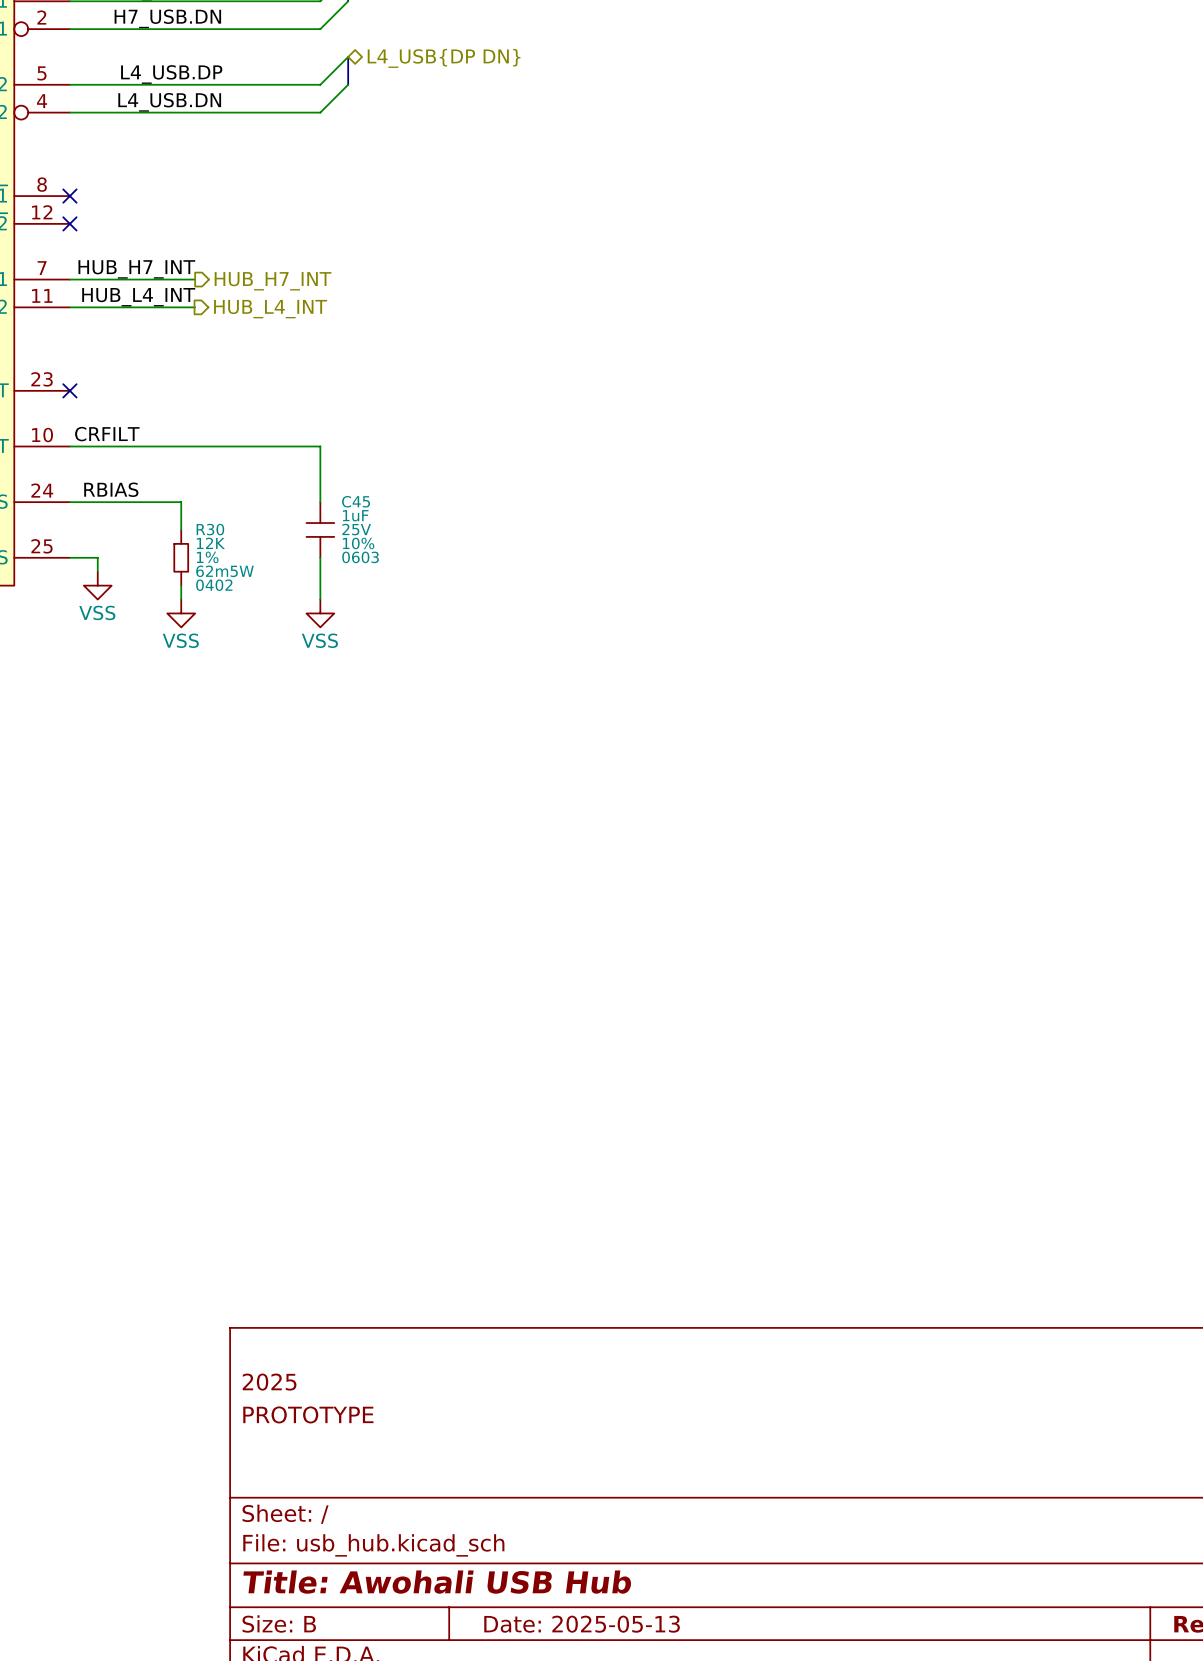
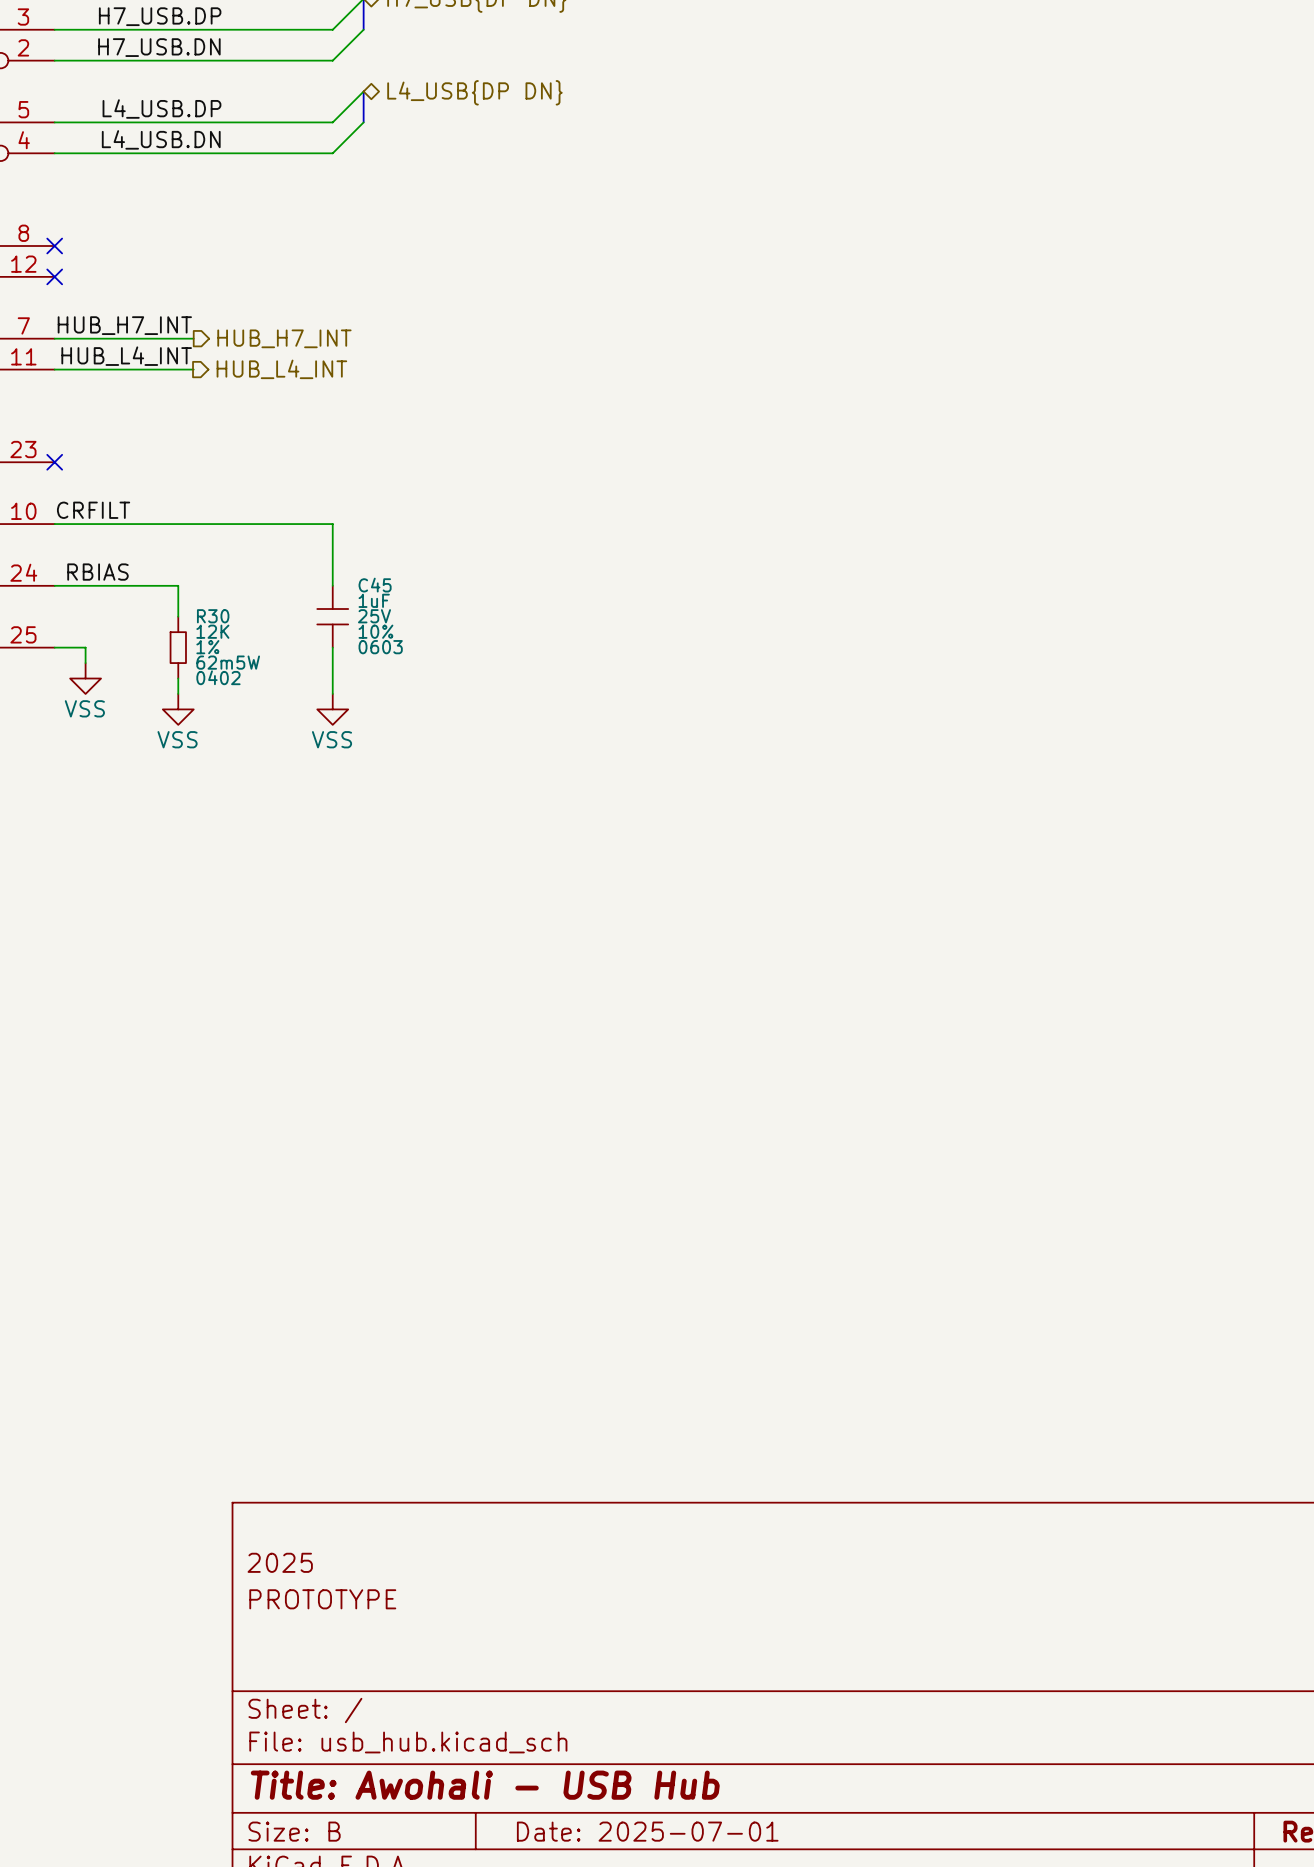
title block: Title: Awohali USB Hub (437, 1582) -> Title: Awohali - USB Hub (485, 1785)
title block: Date: 2025-05-13 (582, 1624) -> Date: 2025-07-01 (647, 1831)

